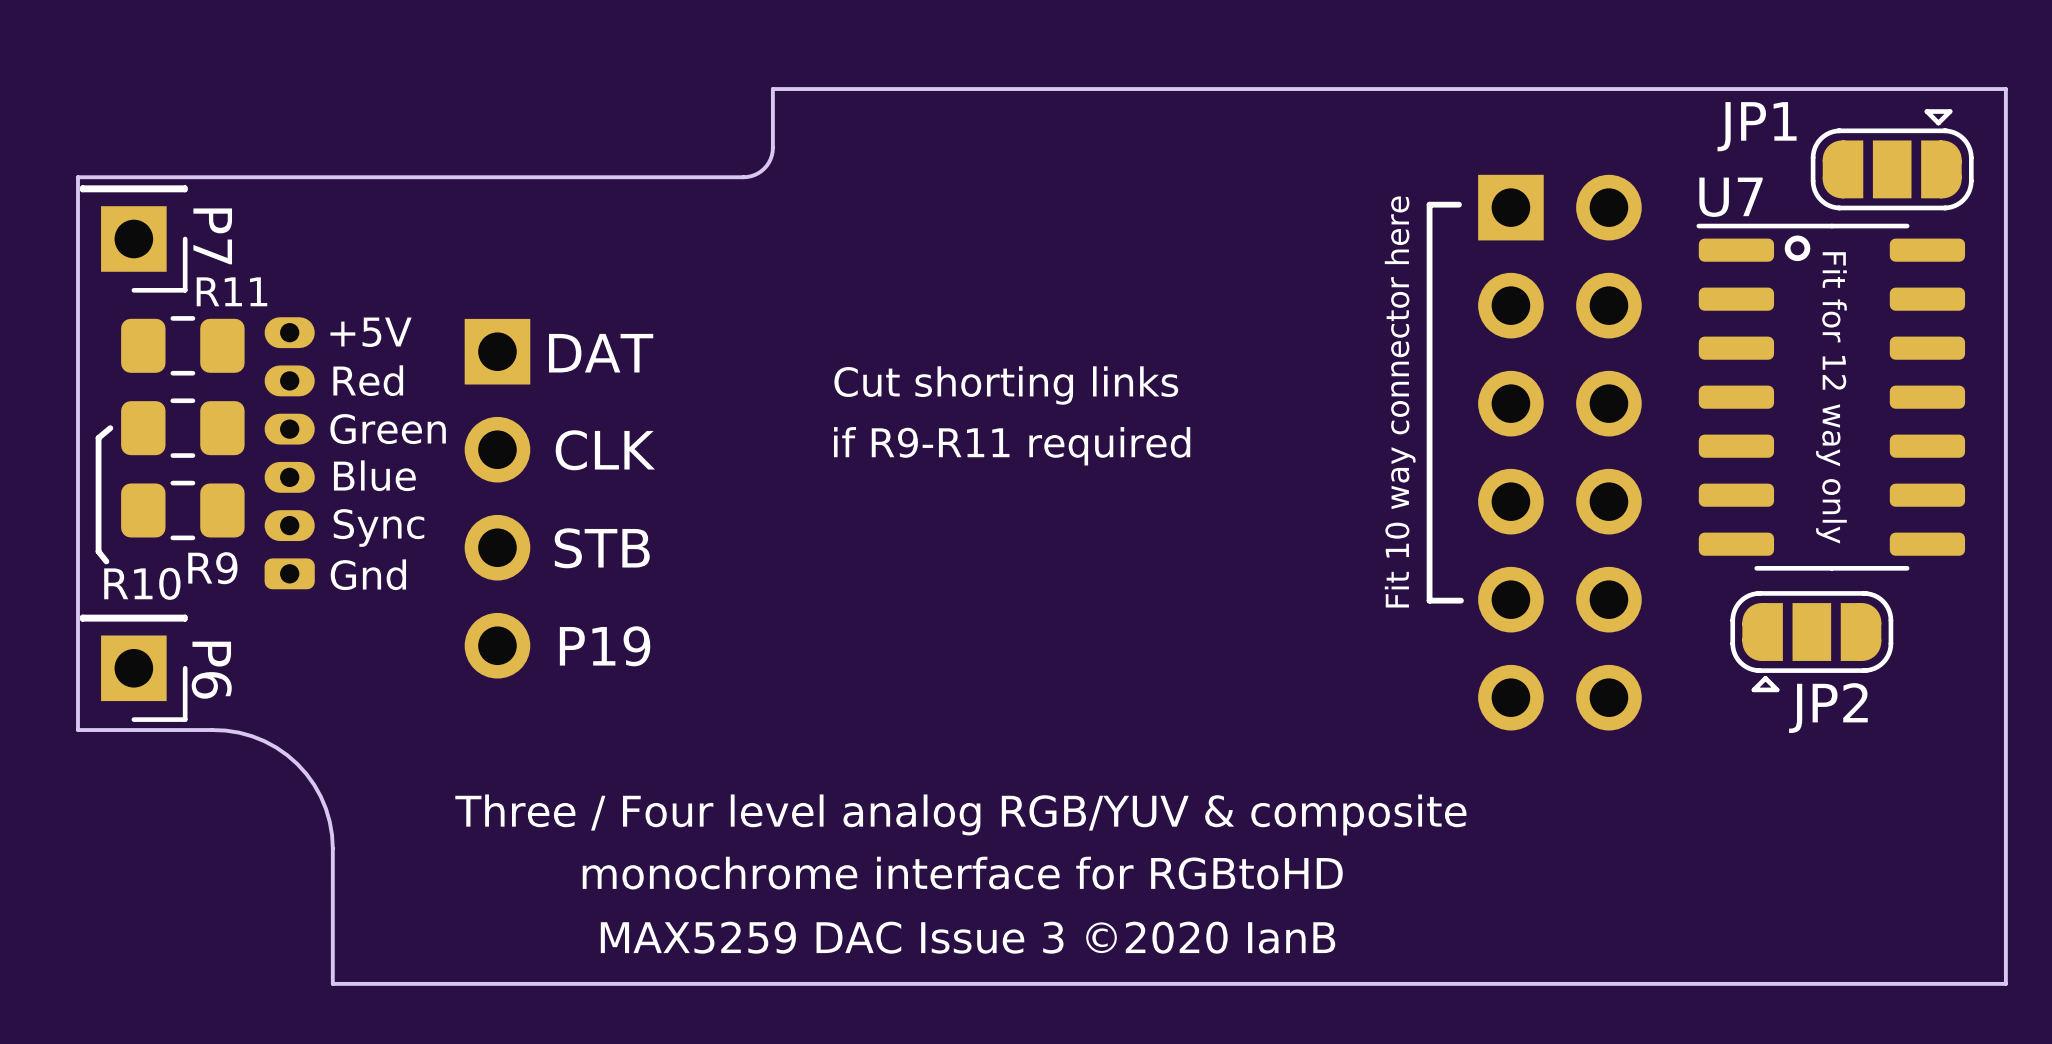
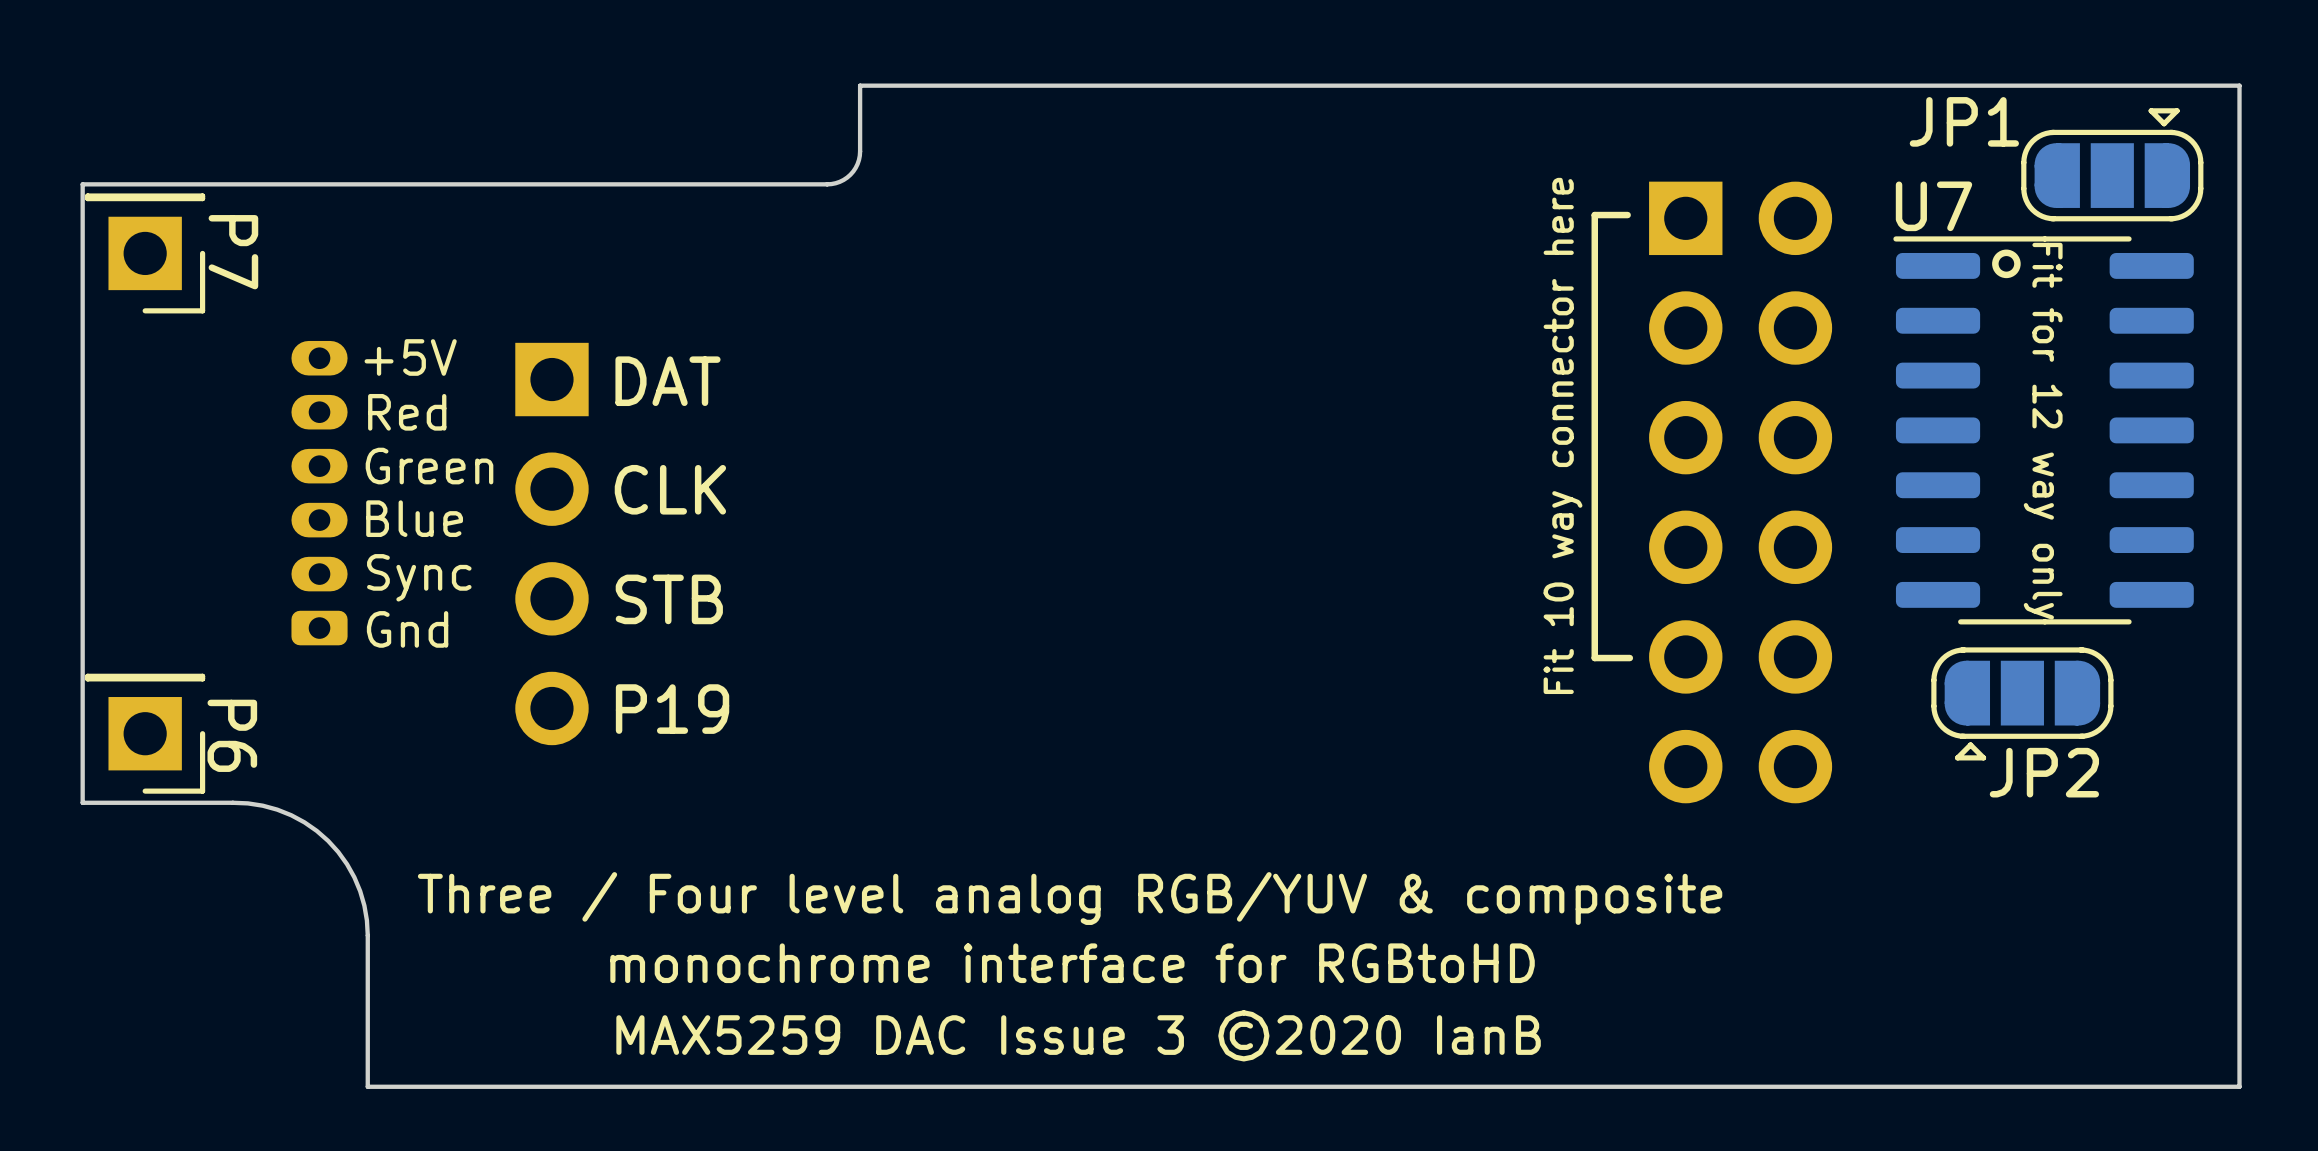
R11: (182, 345) -> none
text: Cut shorting links (1006, 385) -> none
line: (110, 428) (98, 437) (98, 551) (106, 561) -> none
R10: (182, 428) -> none
text: if R9-R11 required (1012, 446) -> none
R9: (182, 510) -> none

